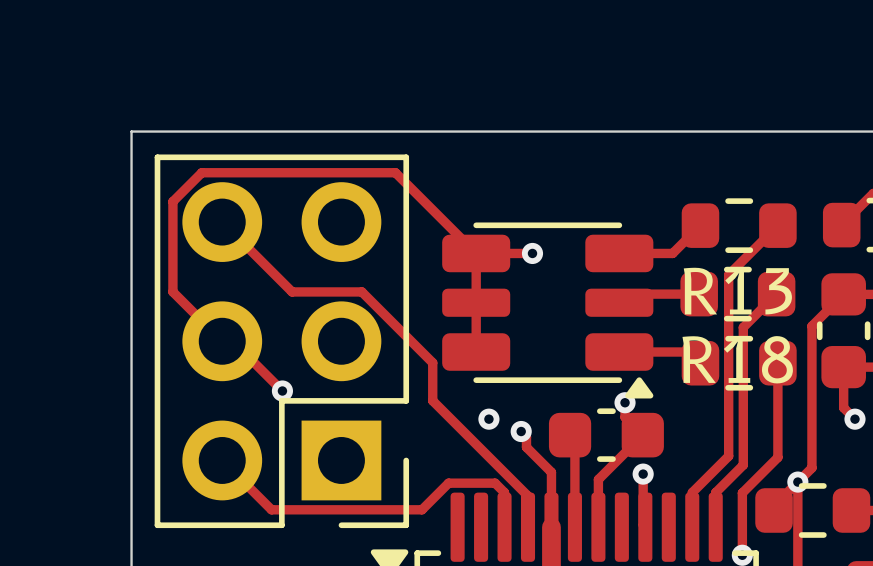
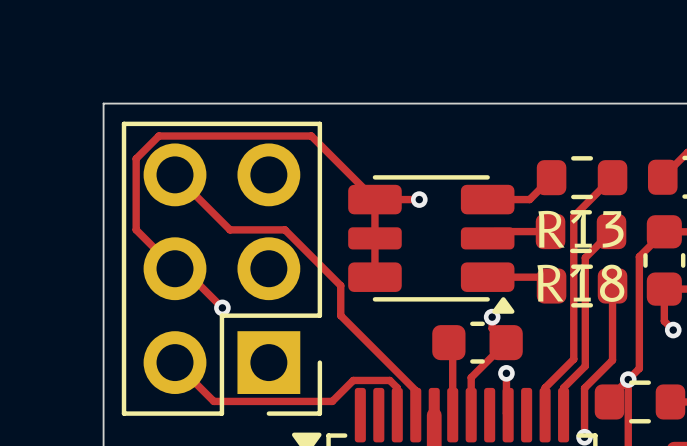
via: (488, 419) -> none
track: (521, 431) (526, 436) (526, 447) (551, 472) (551, 527) -> none
via: (521, 431) -> none

